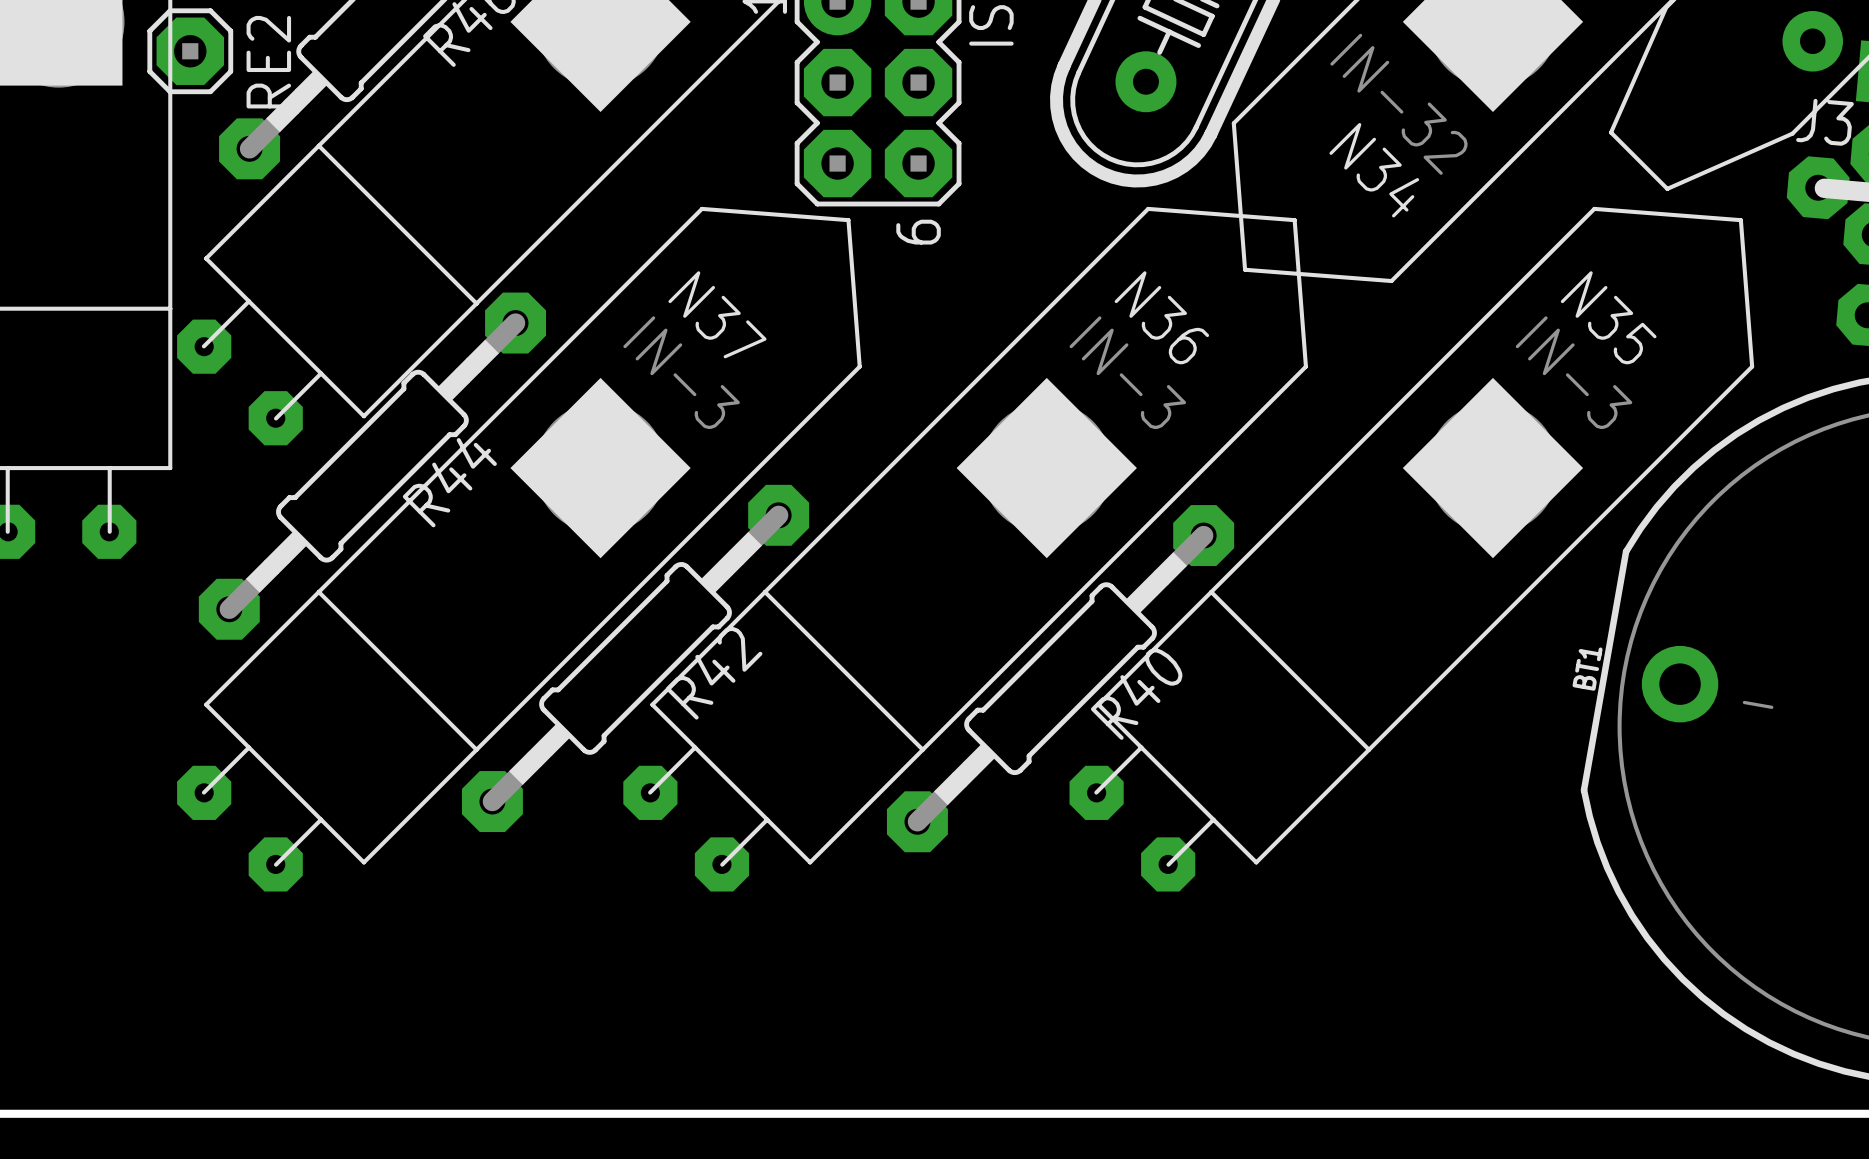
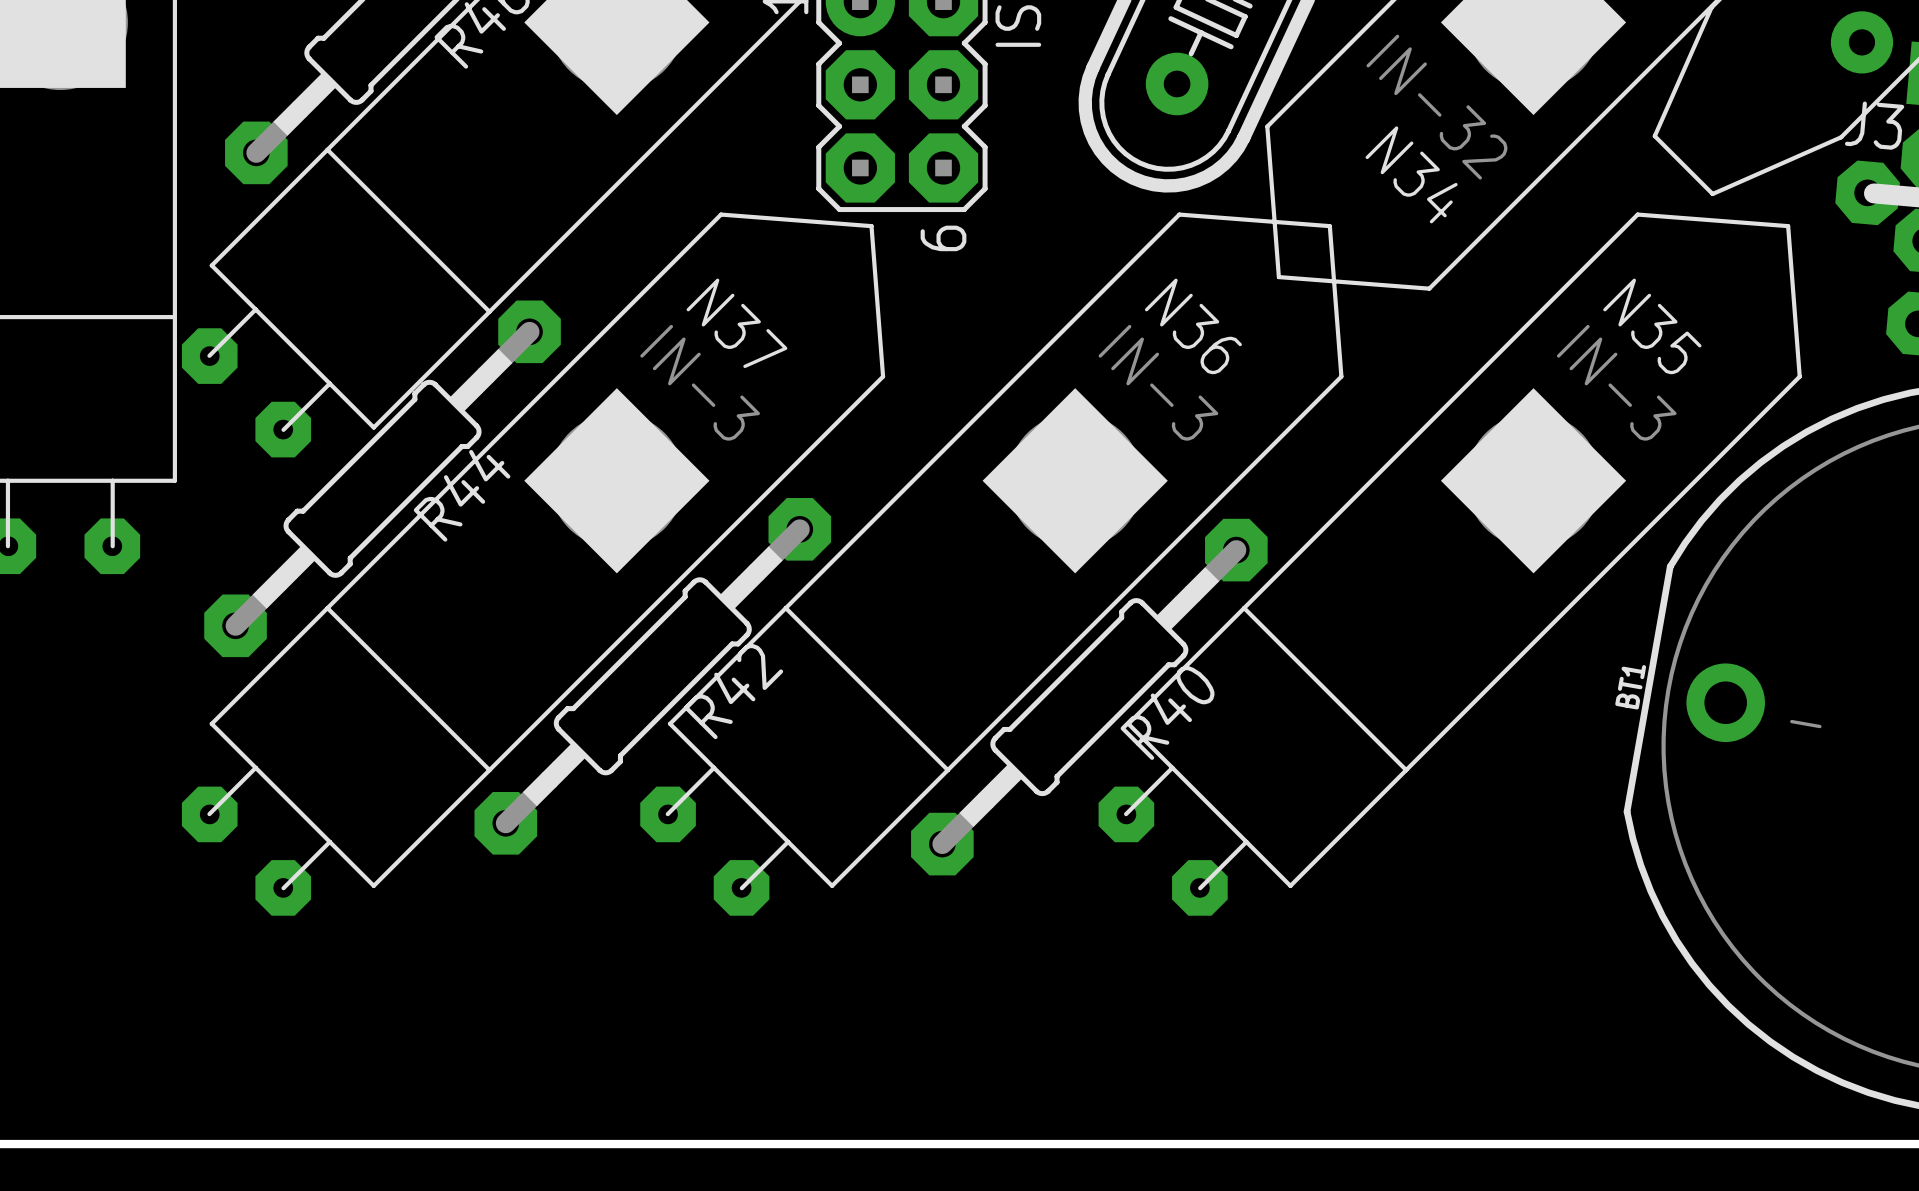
RE2: (190, 51) -> none

